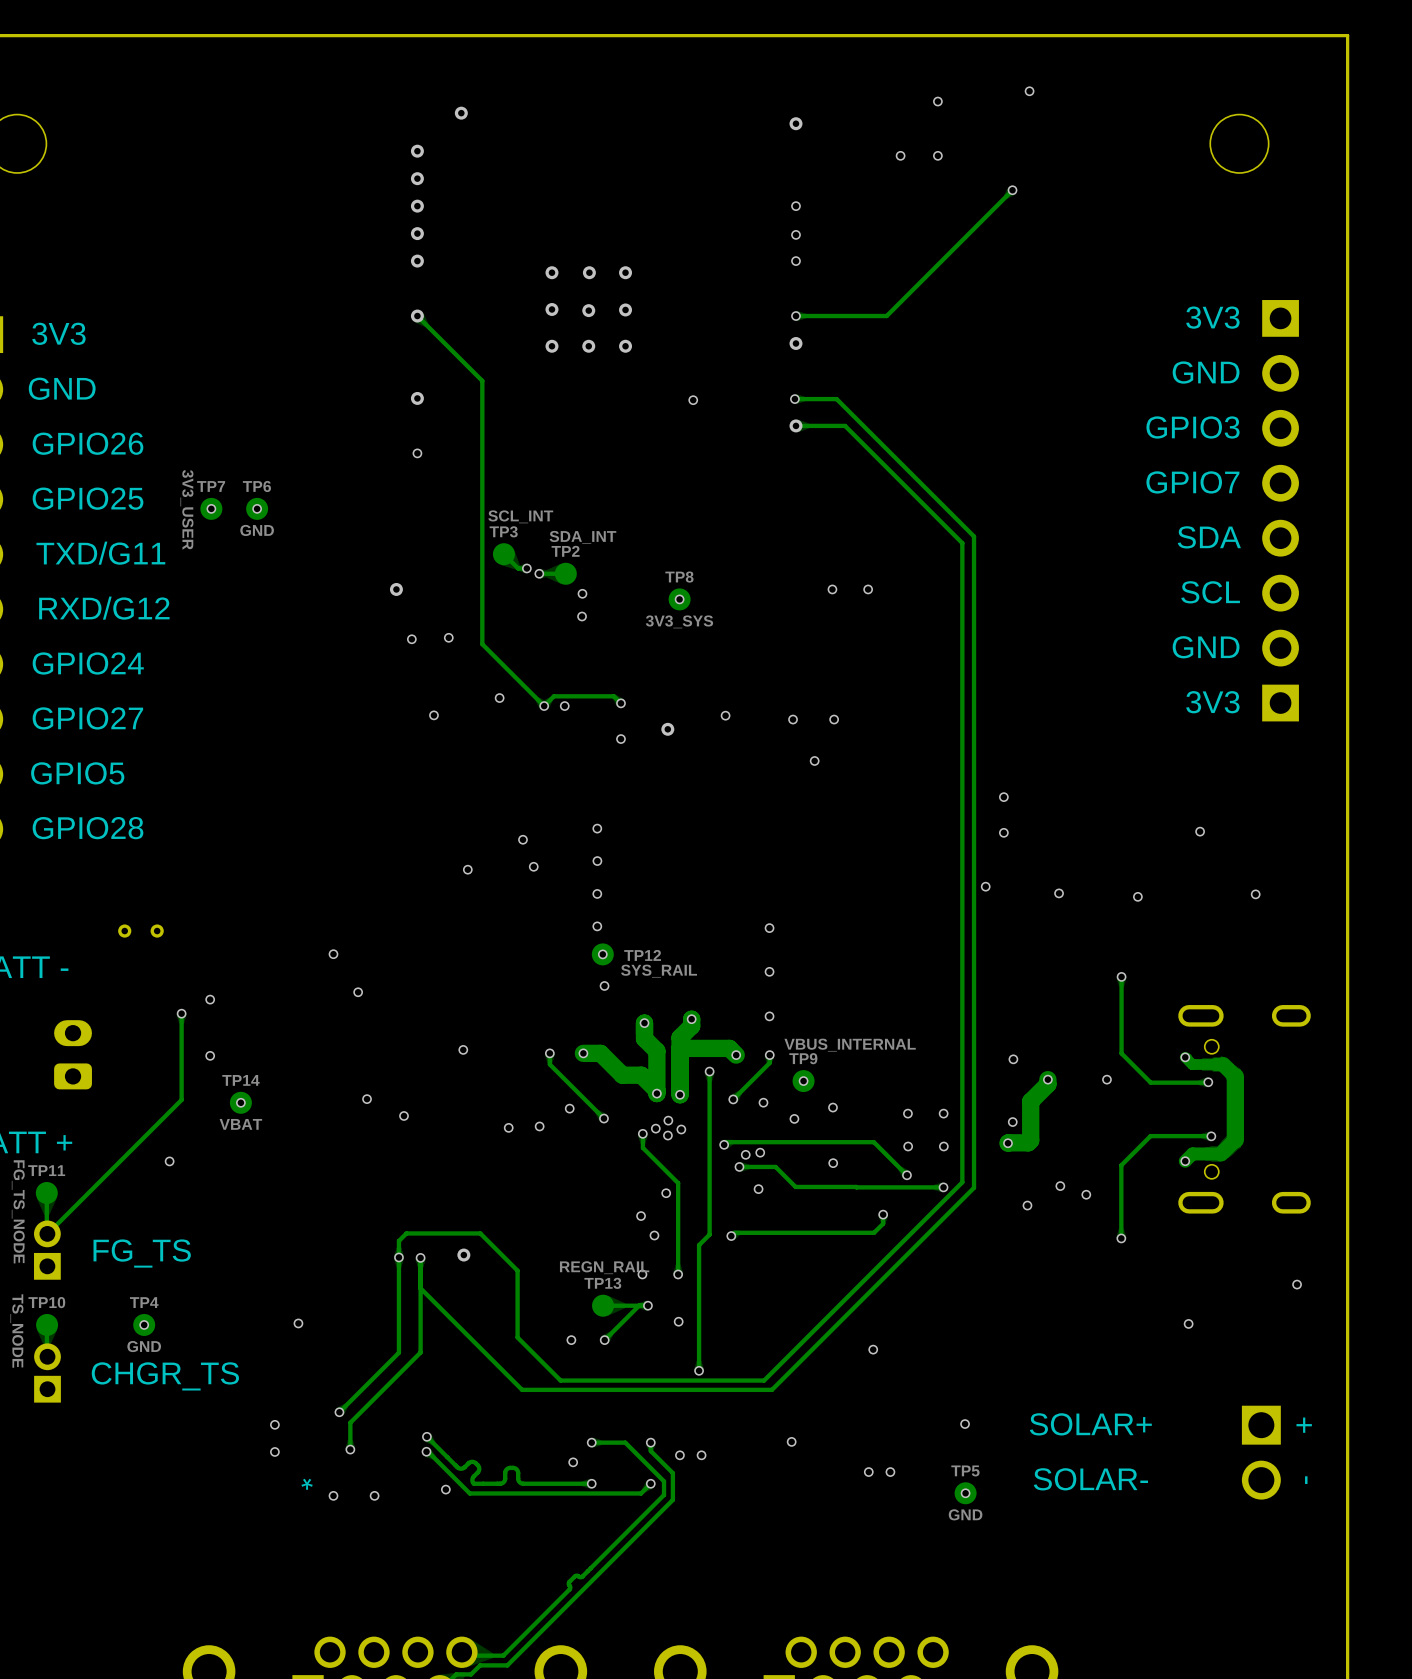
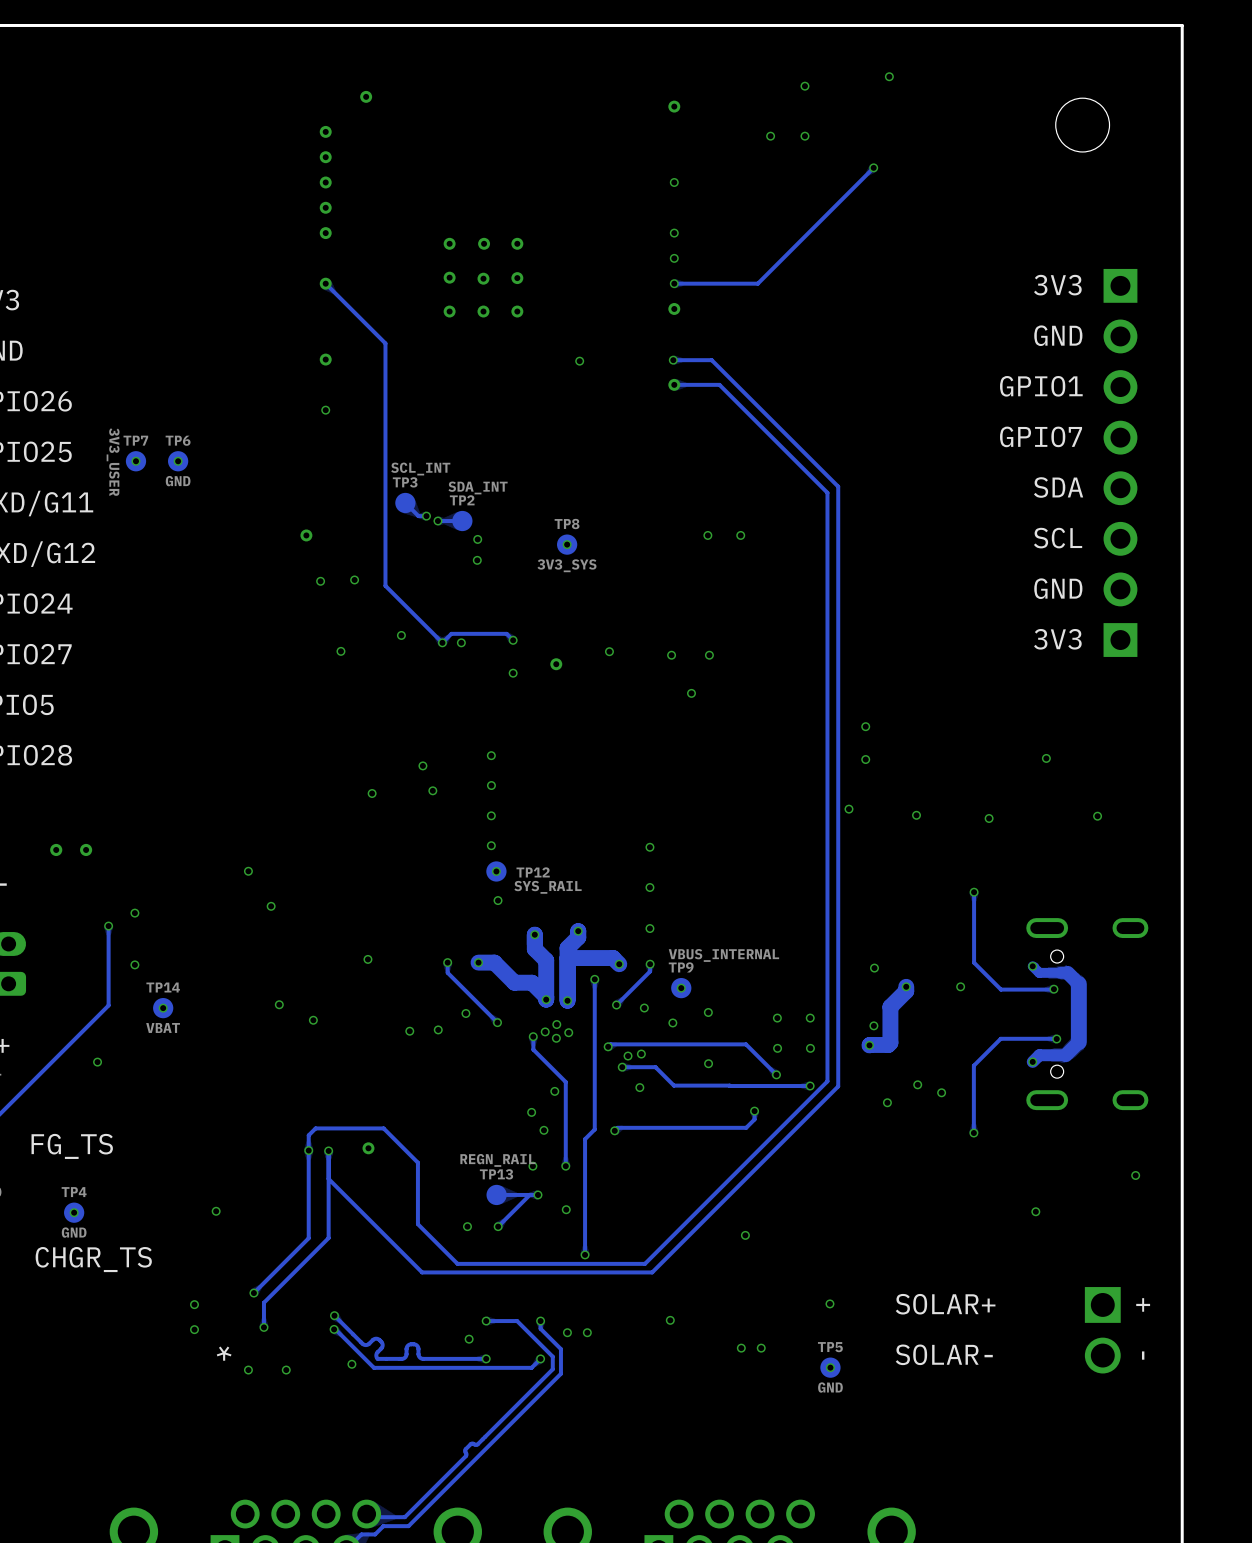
via position: (795, 234) -> (674, 258)
text: GPIO3 (1193, 427) -> GPIO1 (1041, 386)

